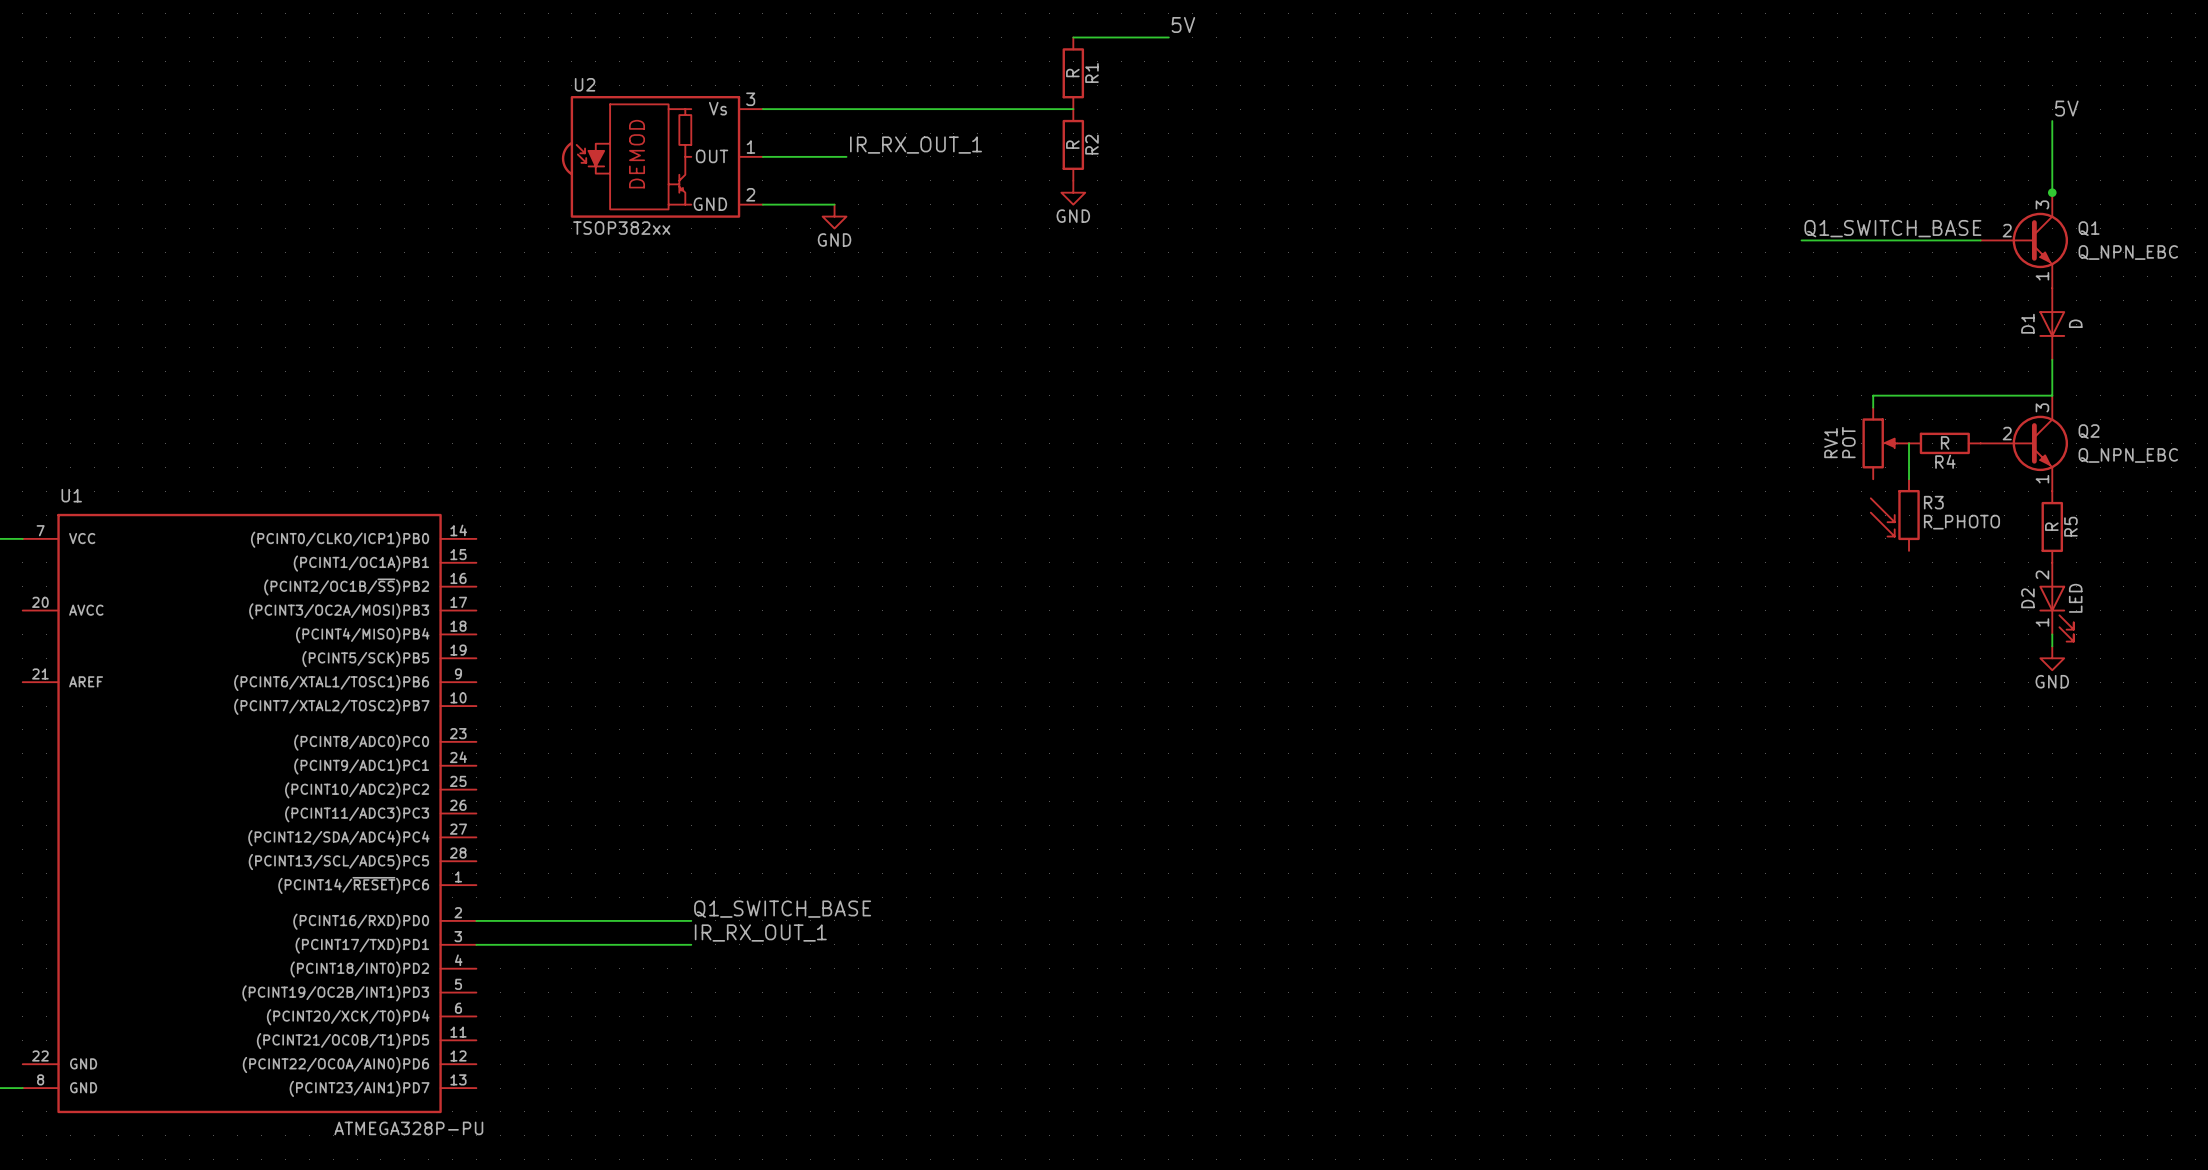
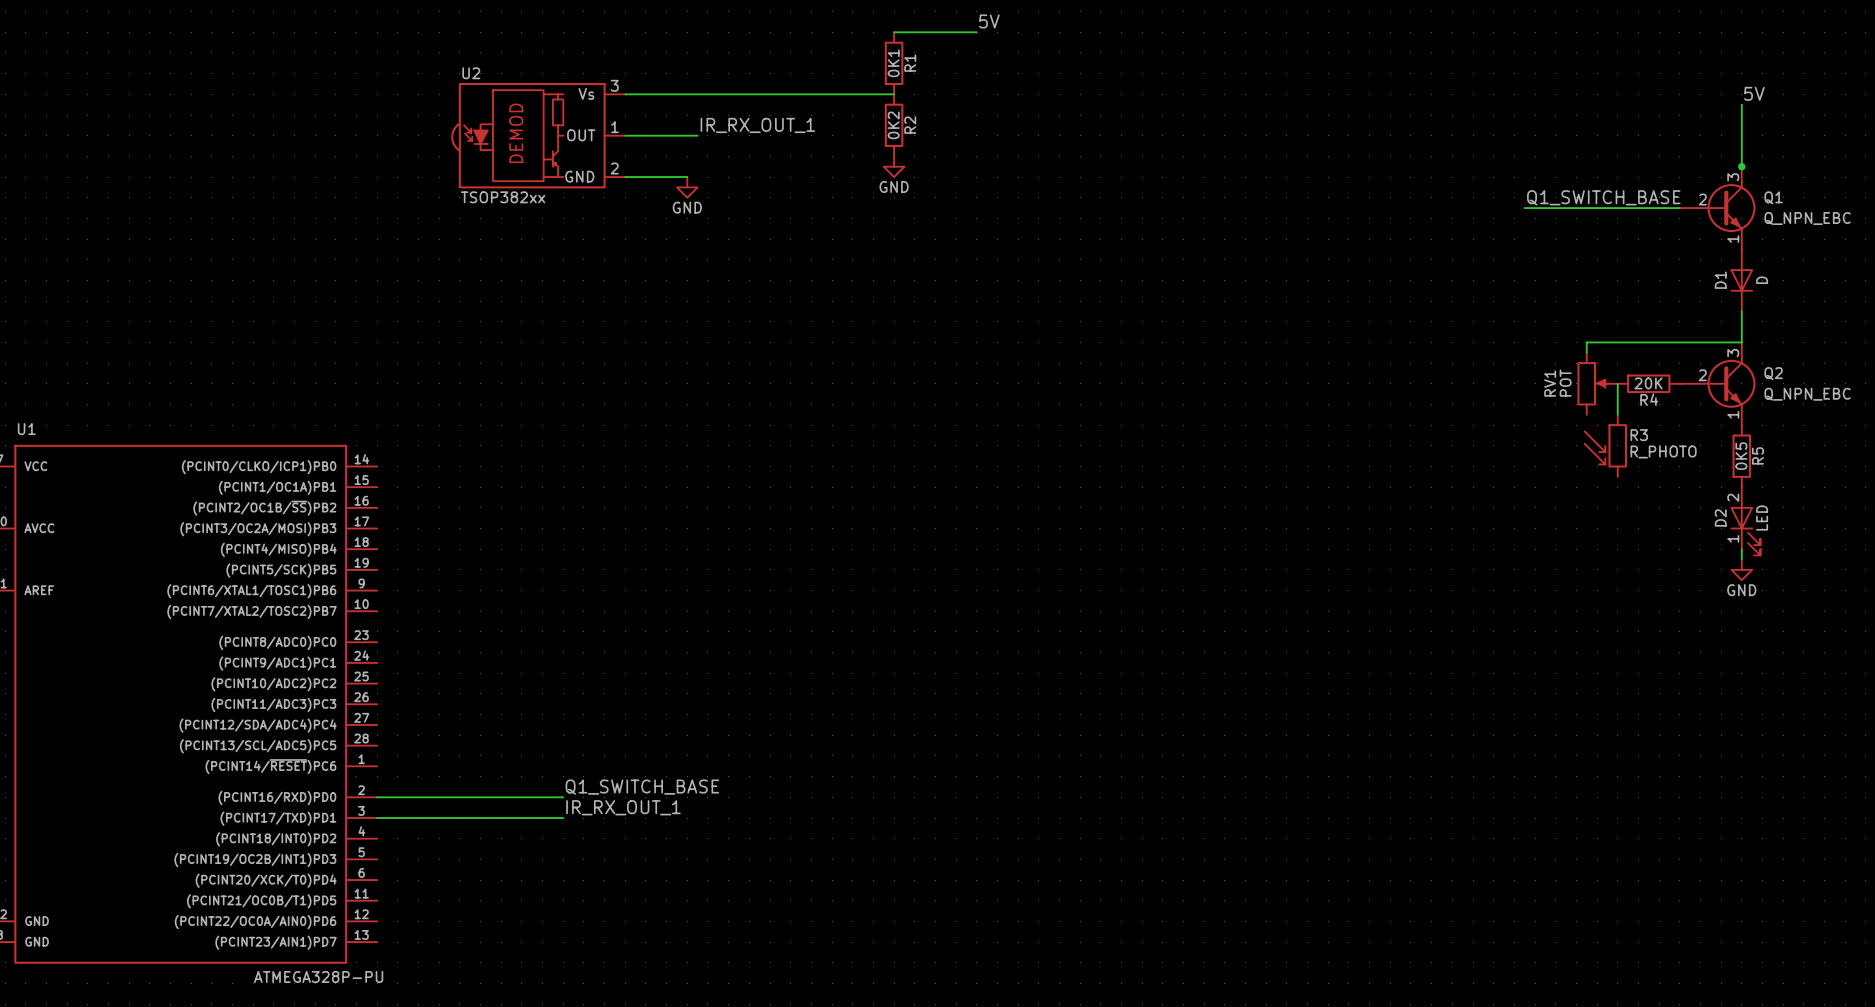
R1 value: R (1072, 73) -> 0K1 (893, 63)
R2 value: R (1072, 144) -> 0K2 (893, 125)
R4 value: R (1945, 442) -> 20K (1648, 383)
R5 value: R (2051, 526) -> 0K5 (1741, 456)

